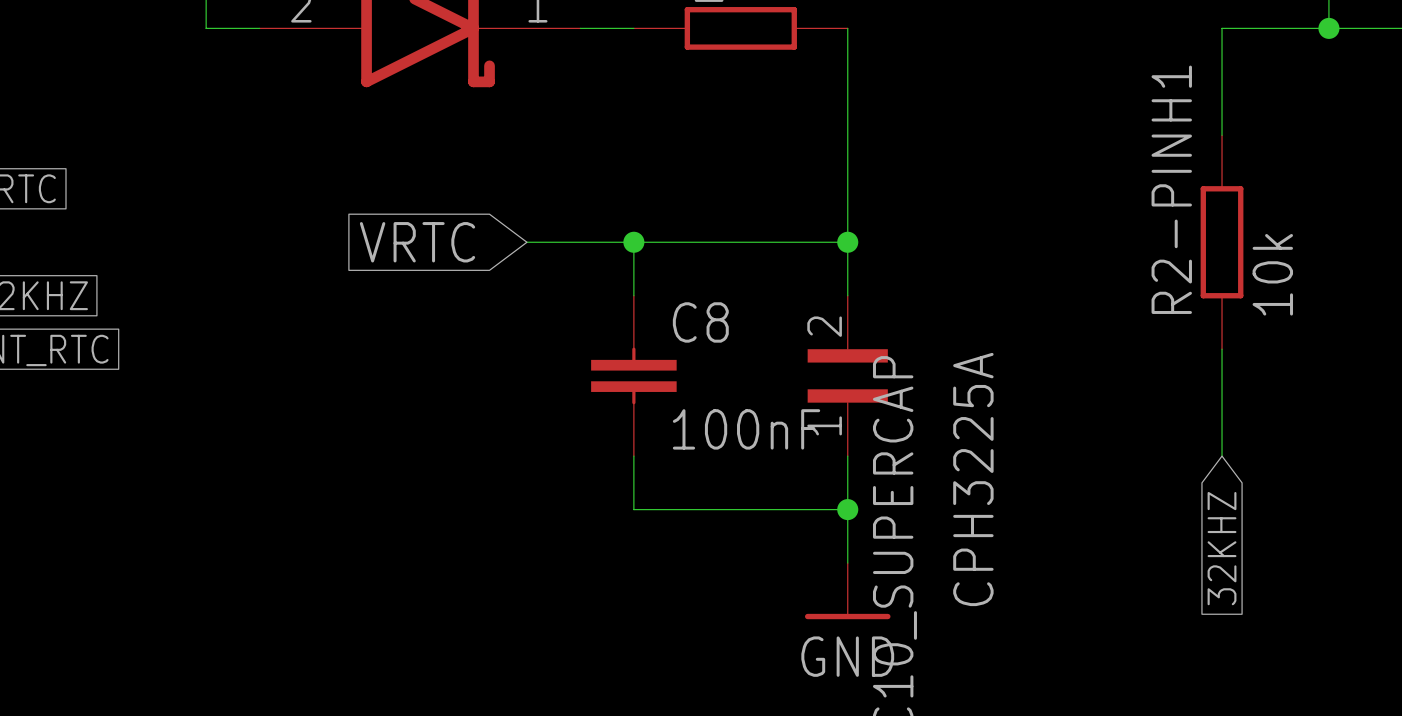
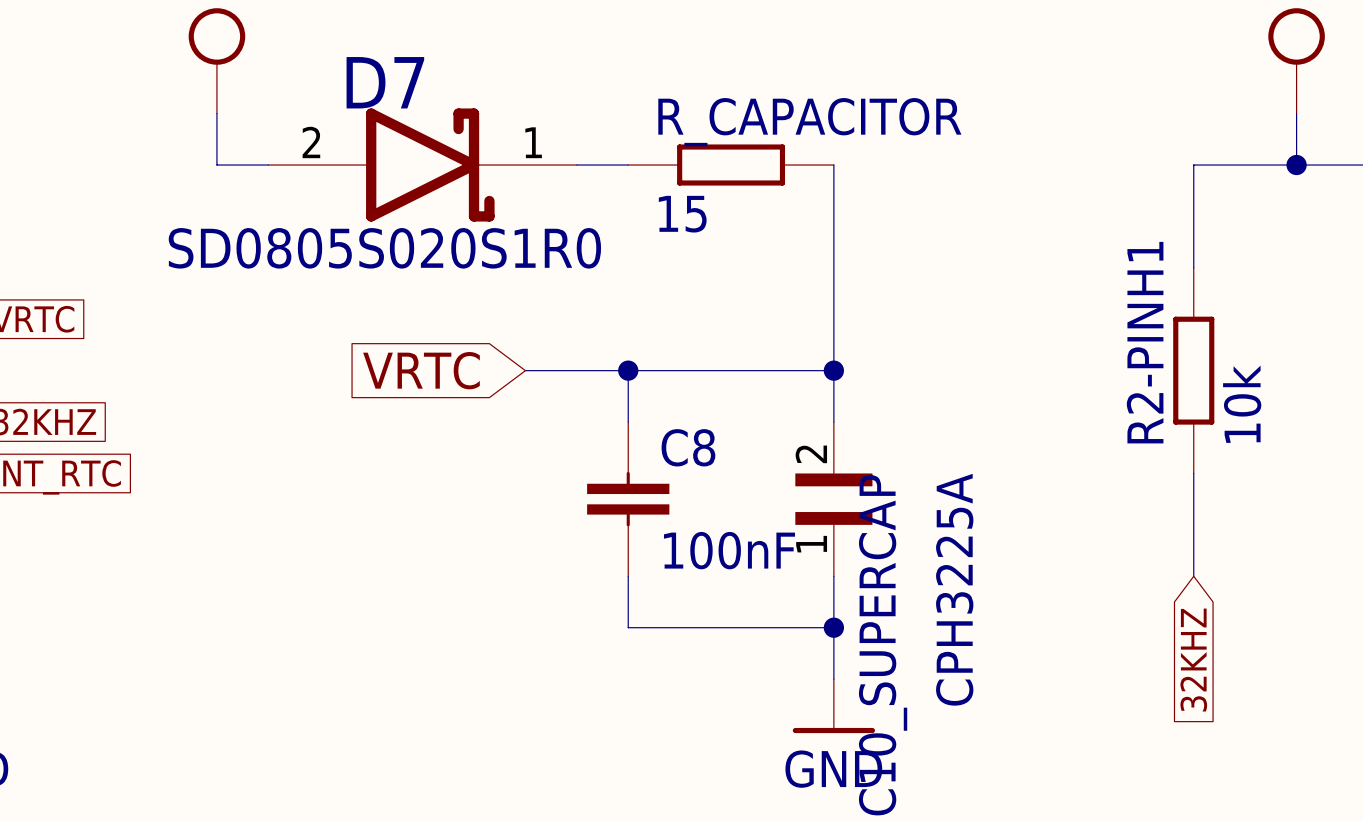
R_CAPACITOR value: none -> 15 (682, 214)
text: none -> SD0805S020S1R0 (384, 248)

